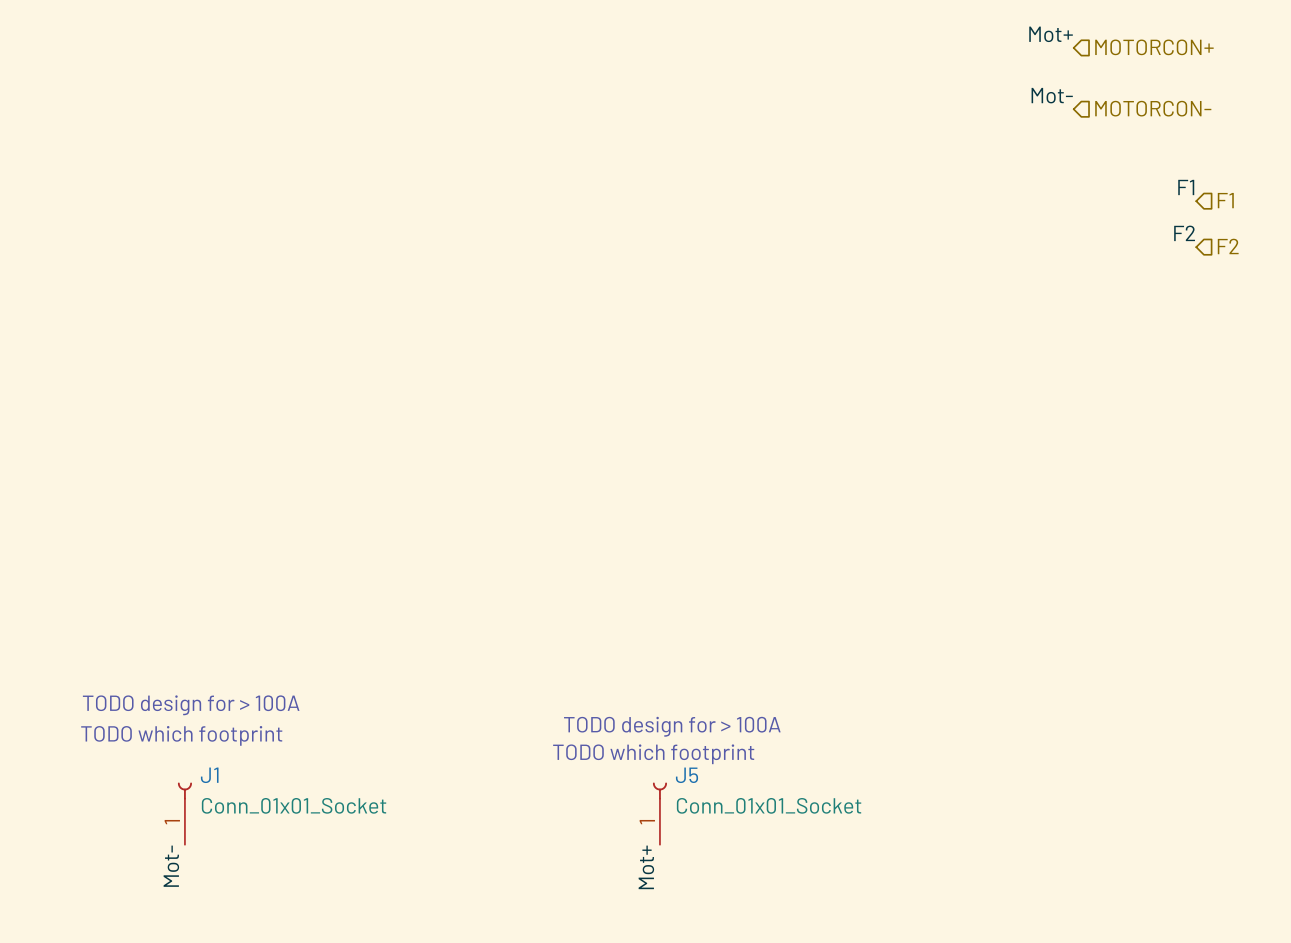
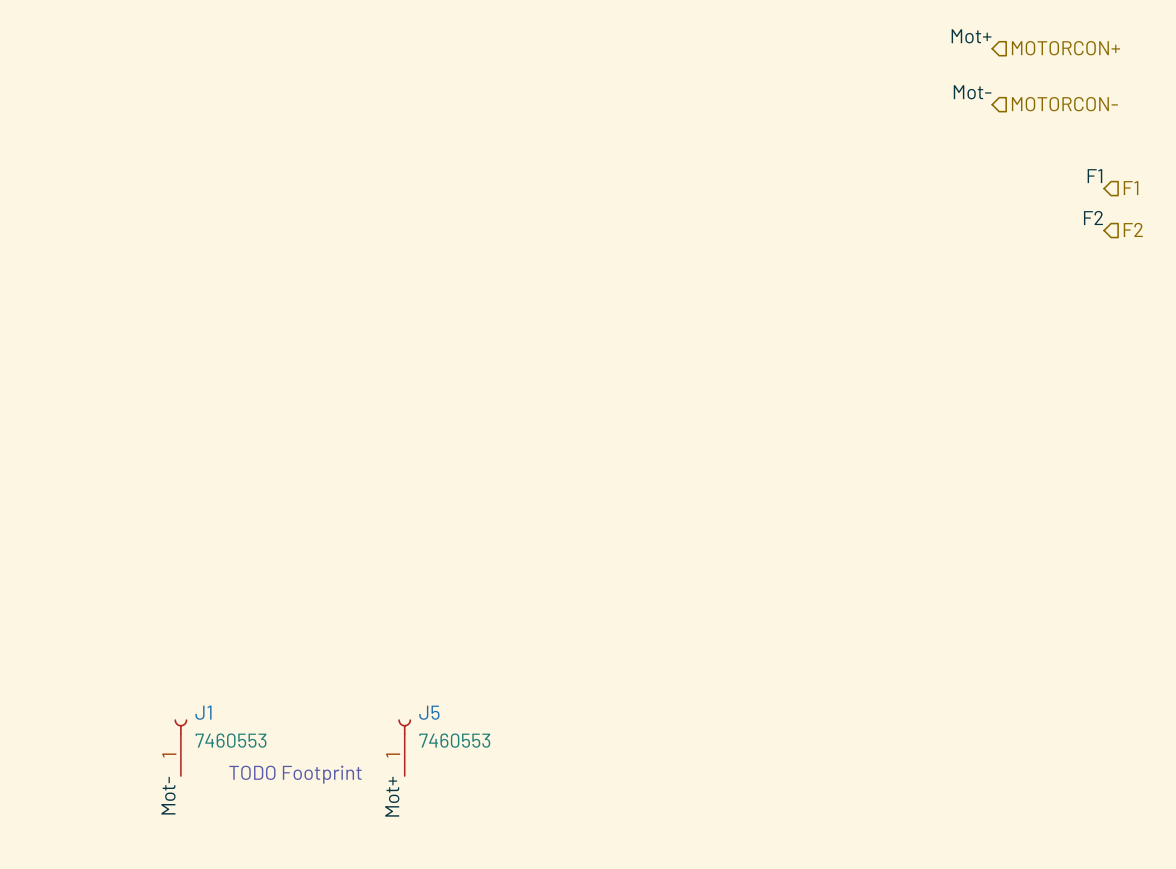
text: TODO design for > 100A (191, 705) -> none
text: TODO design for > 100A (672, 726) -> none
text: TODO which footprint (181, 735) -> none
text: TODO which footprint (653, 754) -> none
J1 value: Conn_01x01_Socket (294, 805) -> 7460553 (231, 740)
J5 value: Conn_01x01_Socket (769, 805) -> 7460553 (454, 740)
J5 position: (659, 813) -> (404, 747)
text: none -> TODO Footprint (295, 774)
label position: Mot+ (646, 867) -> Mot+ (392, 796)

